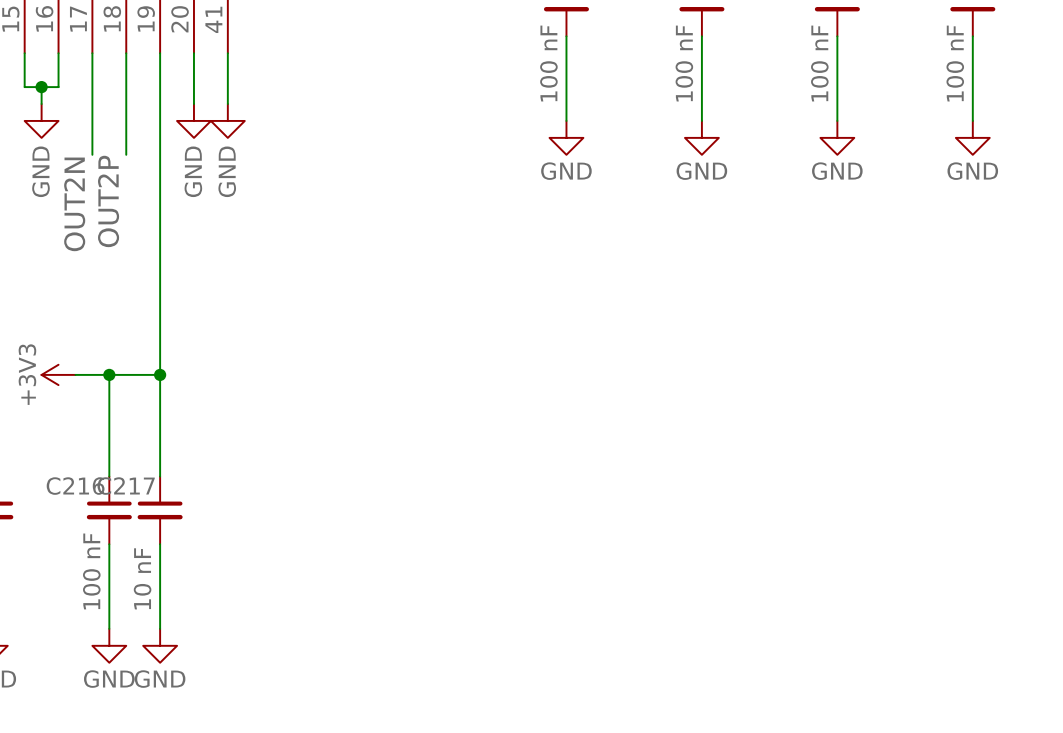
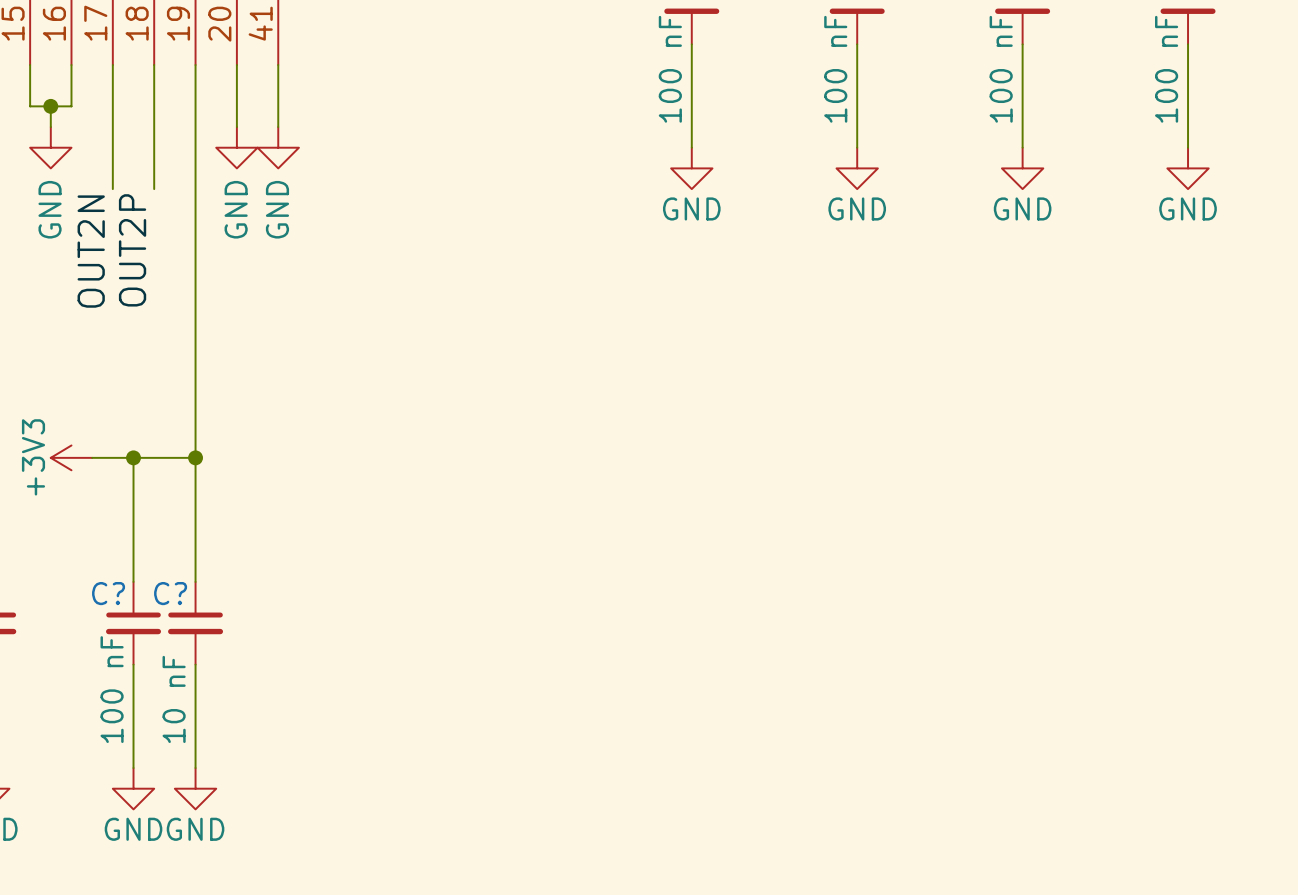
C216 name: C216 (75, 486) -> C? (108, 593)
C217 name: C217 (126, 486) -> C? (170, 593)

